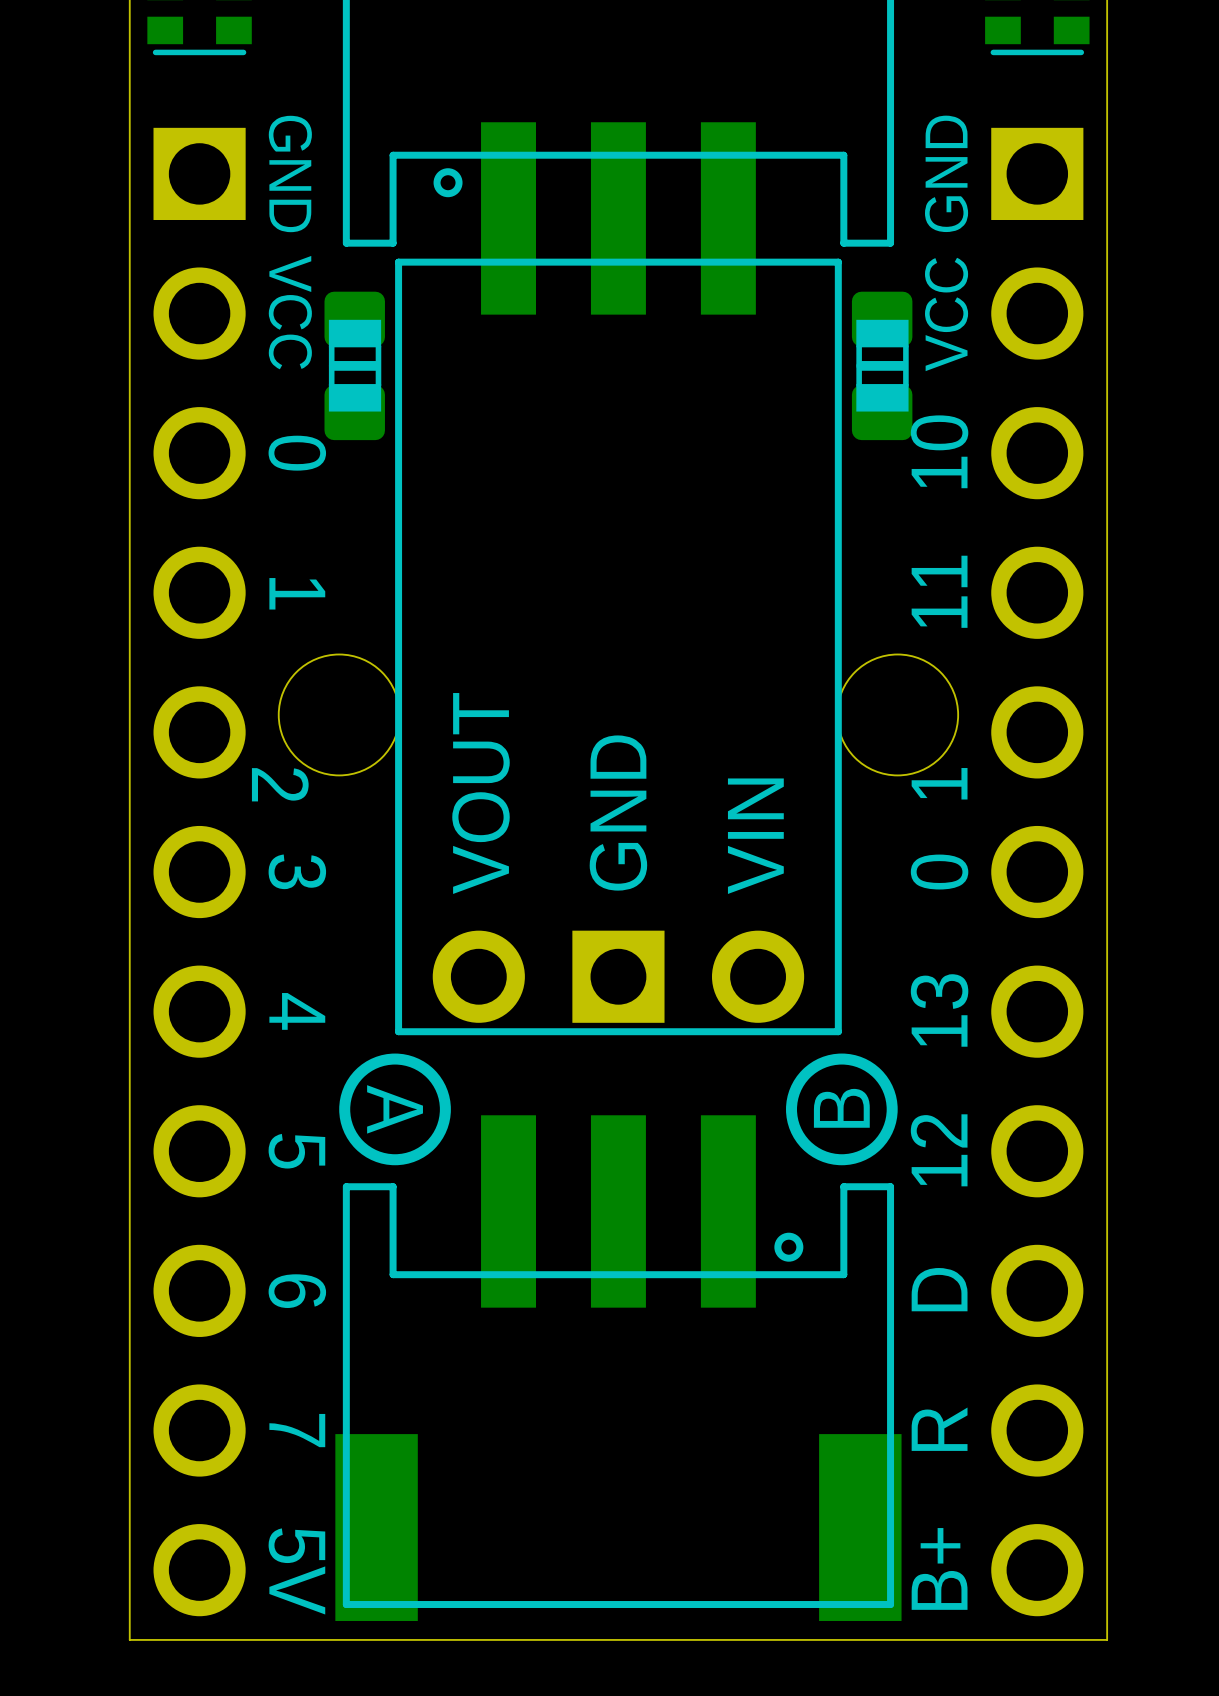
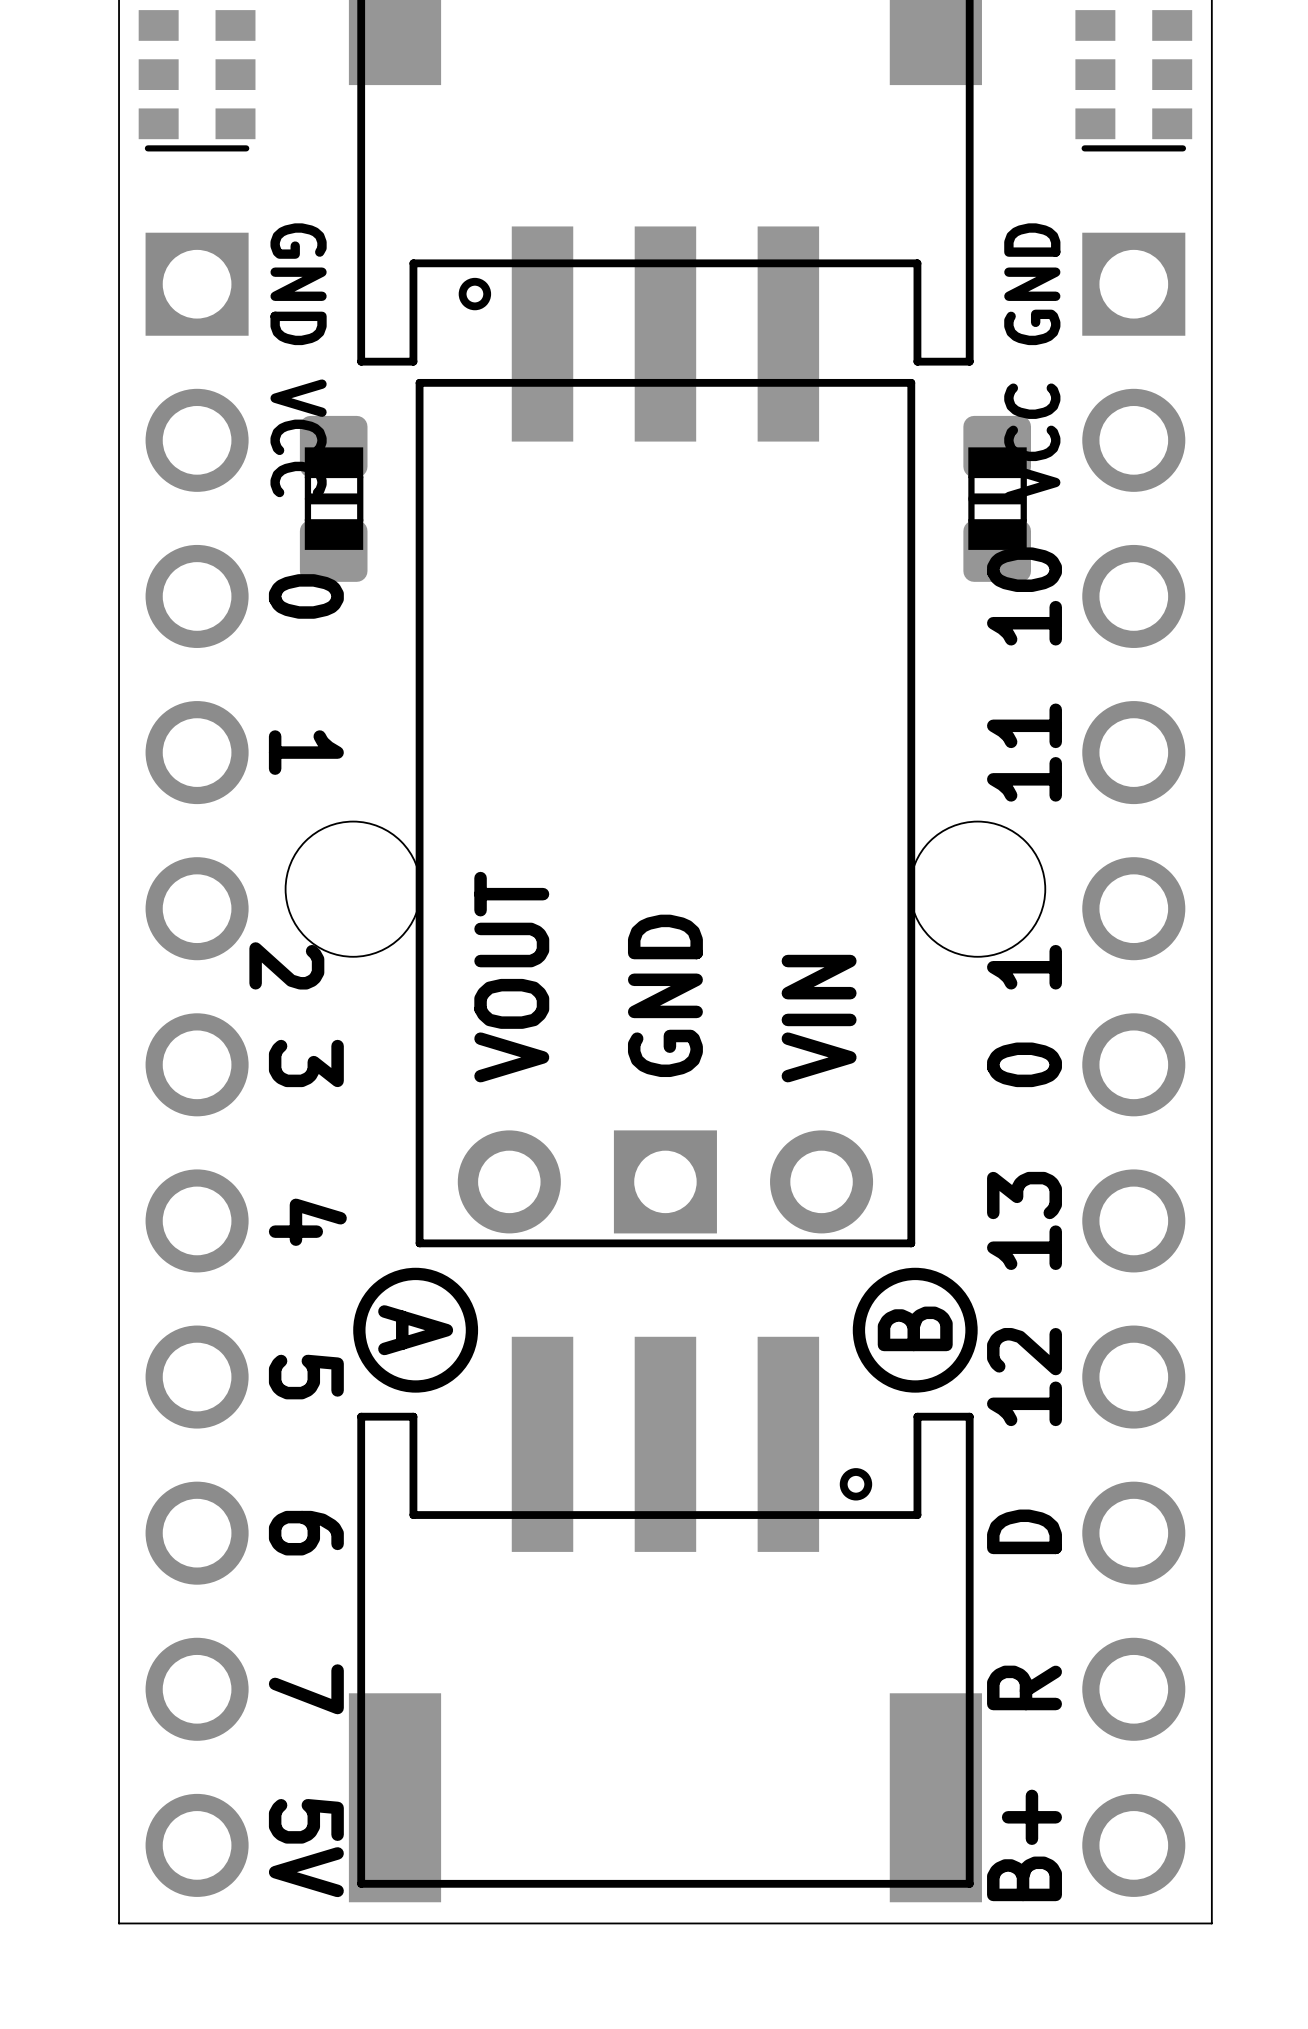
part position: (354, 365) -> (333, 498)
part position: (882, 365) -> (997, 498)

